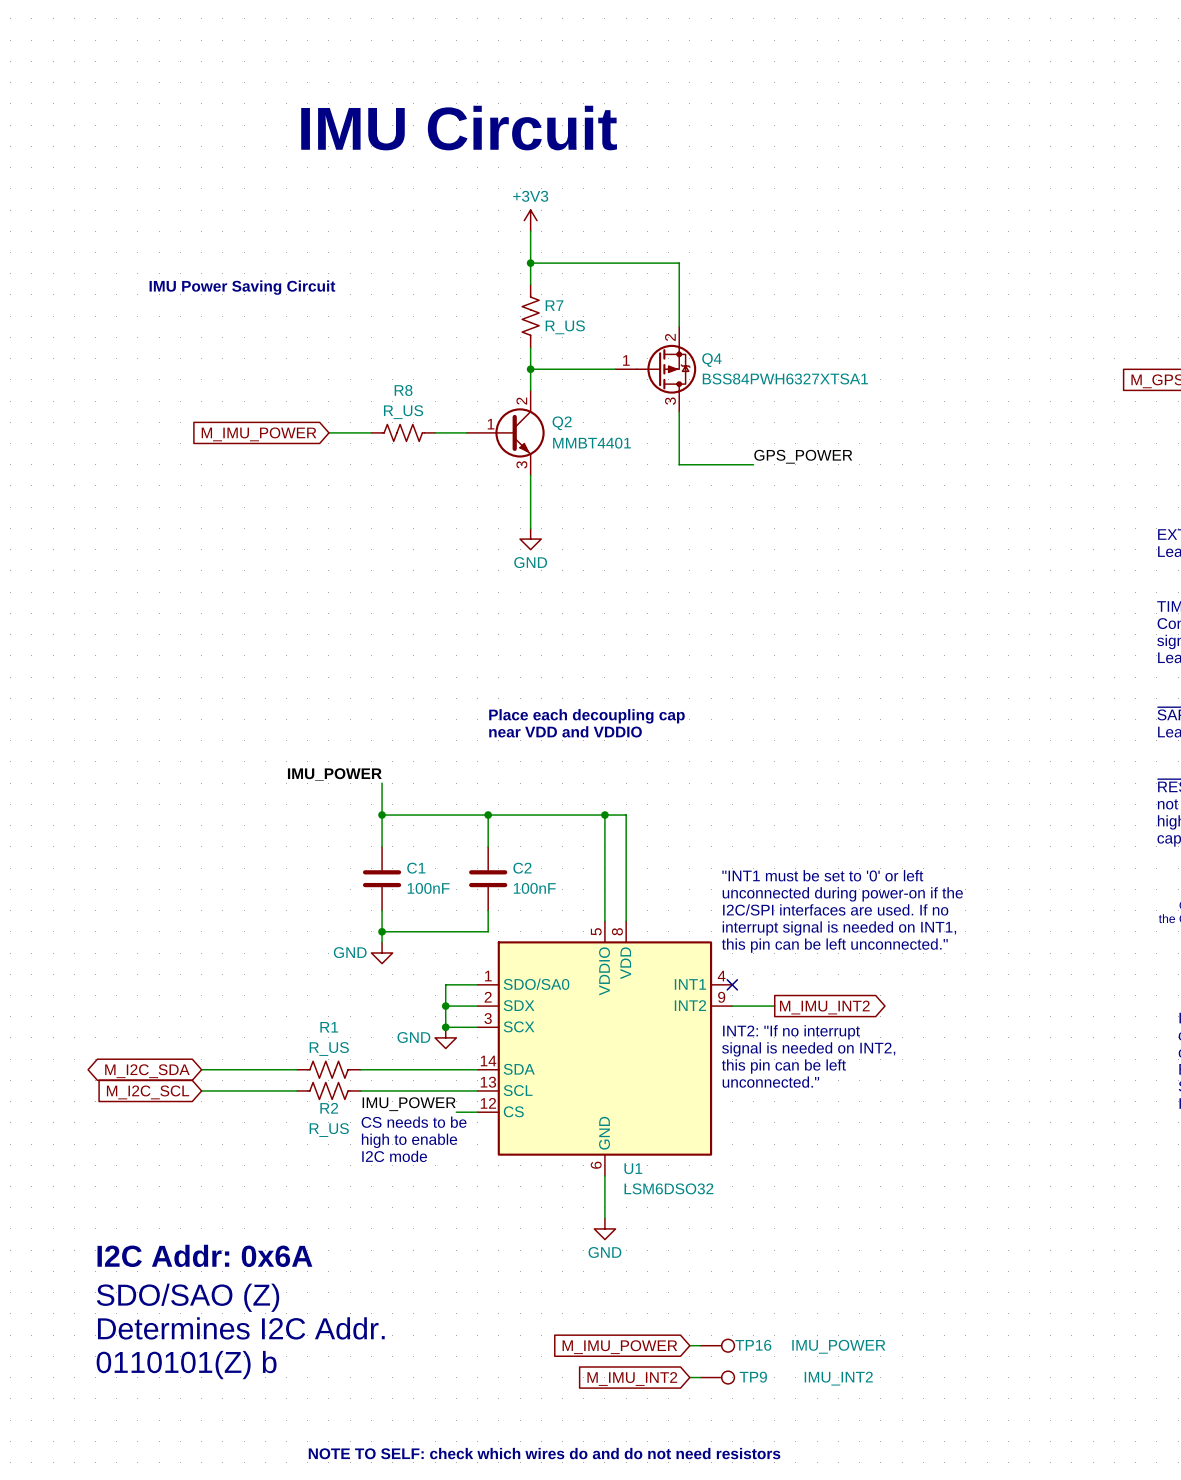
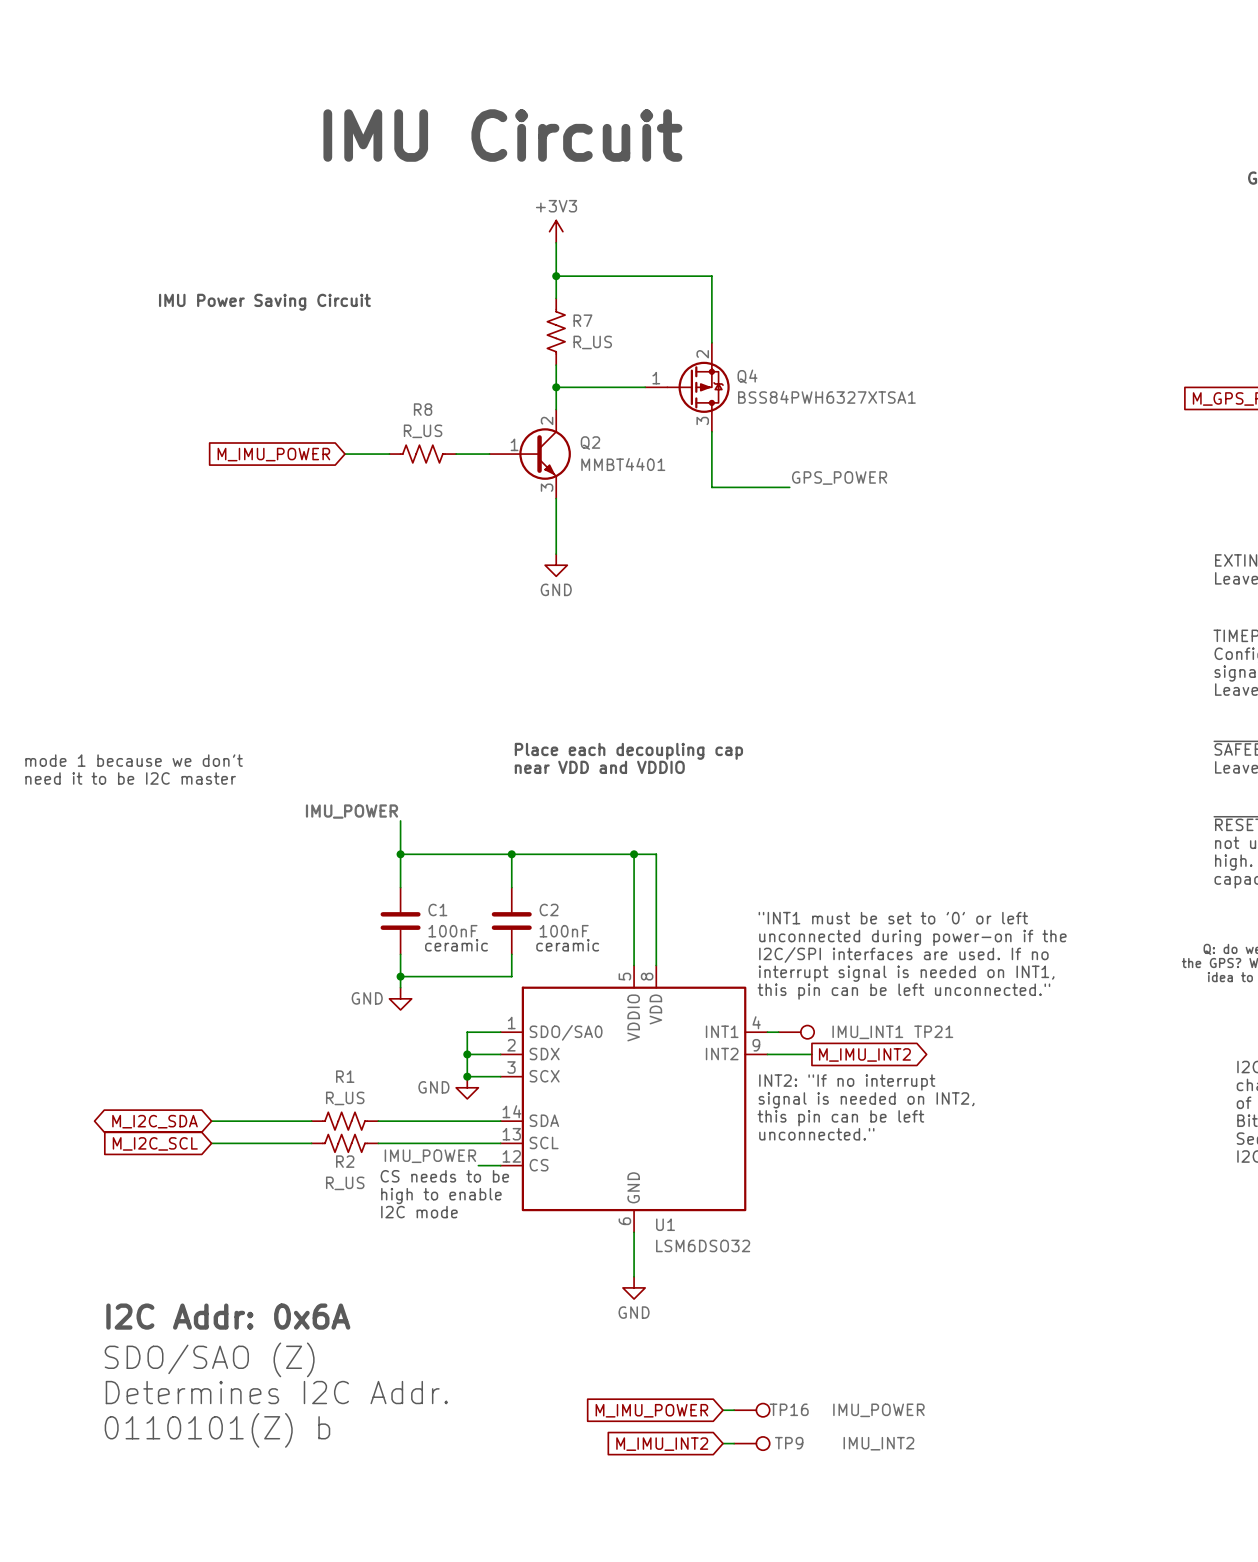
text: none -> mode 1 because we don't (134, 760)
text: none -> need it to be I2C master (130, 778)
text: none -> ceramic (456, 945)
text: none -> ceramic (567, 945)
wire: none -> (767, 1032) (778, 1032)
no-connect mark: (732, 984) -> none
TP21: none -> IMU_INT1 (796, 1032)
text: NOTE TO SELF: check which wires do and do not need resistors (544, 1453) -> none

